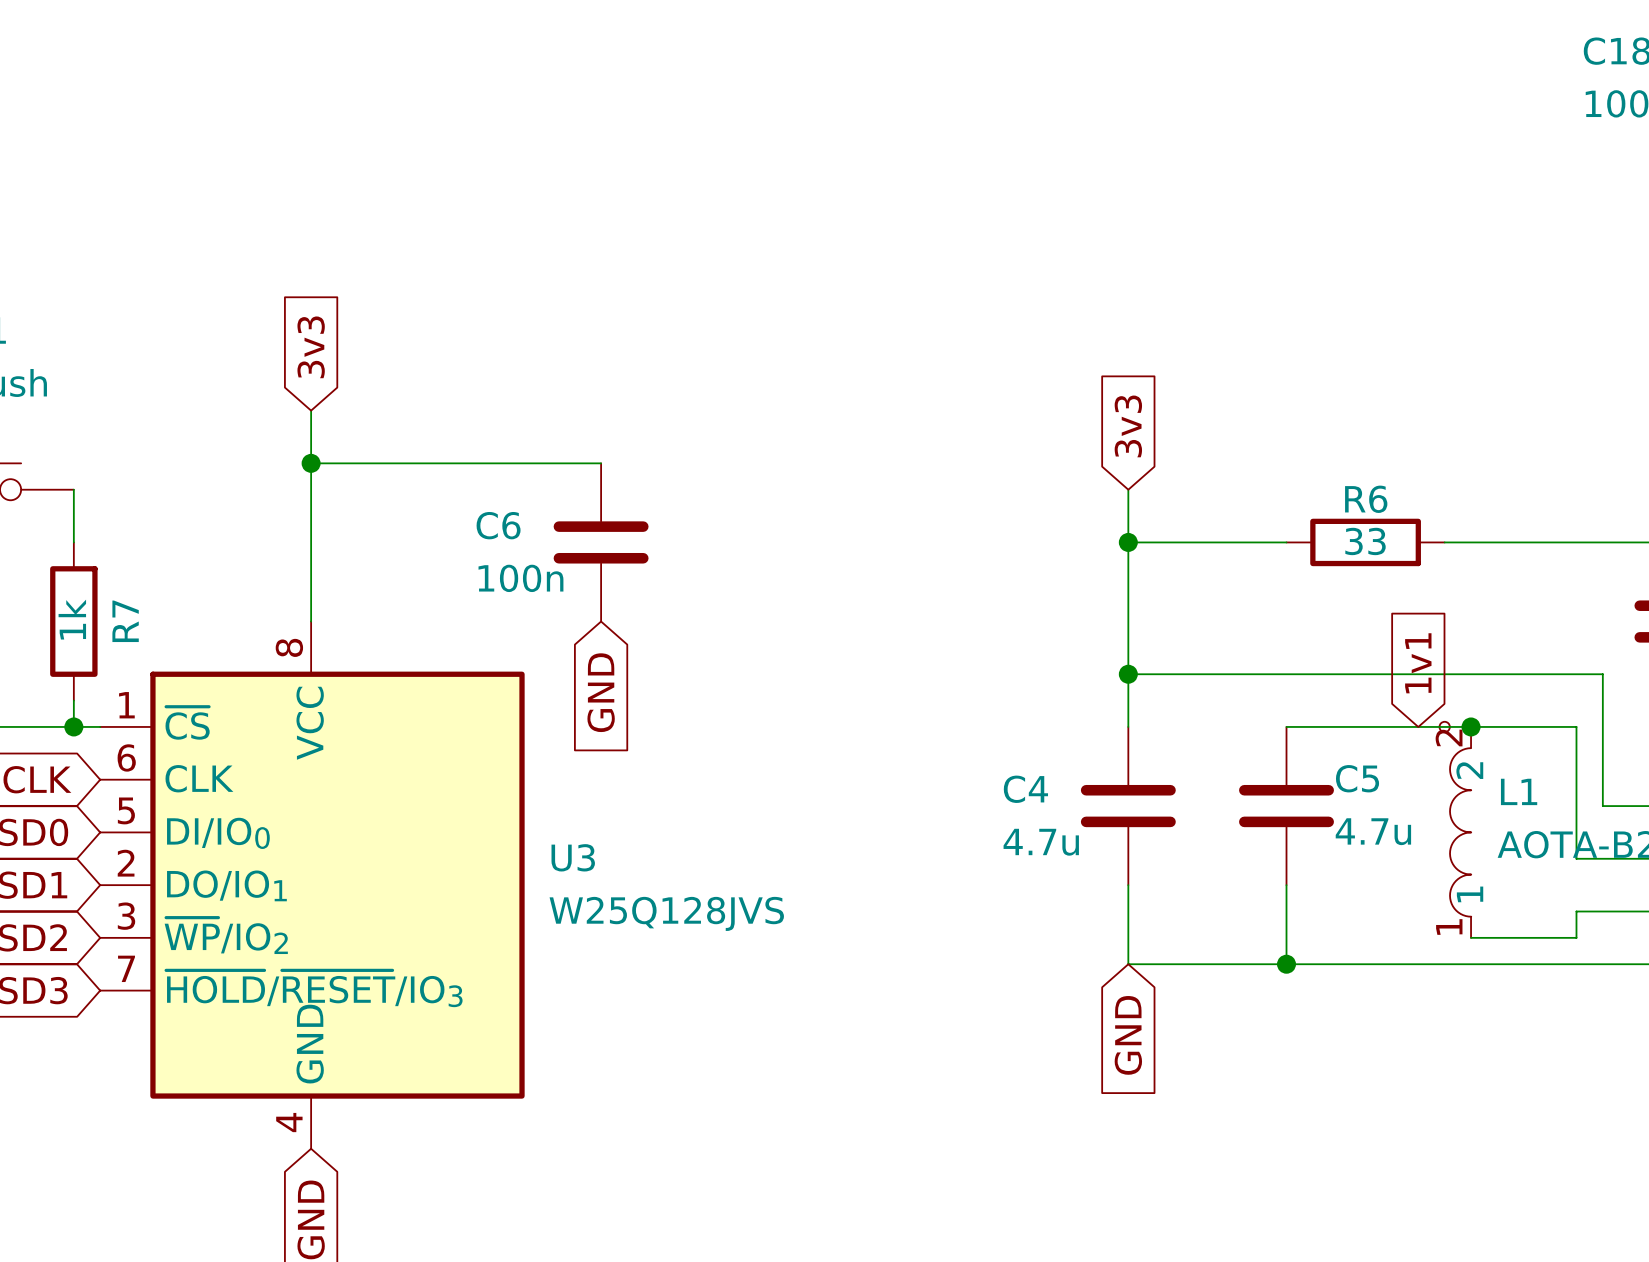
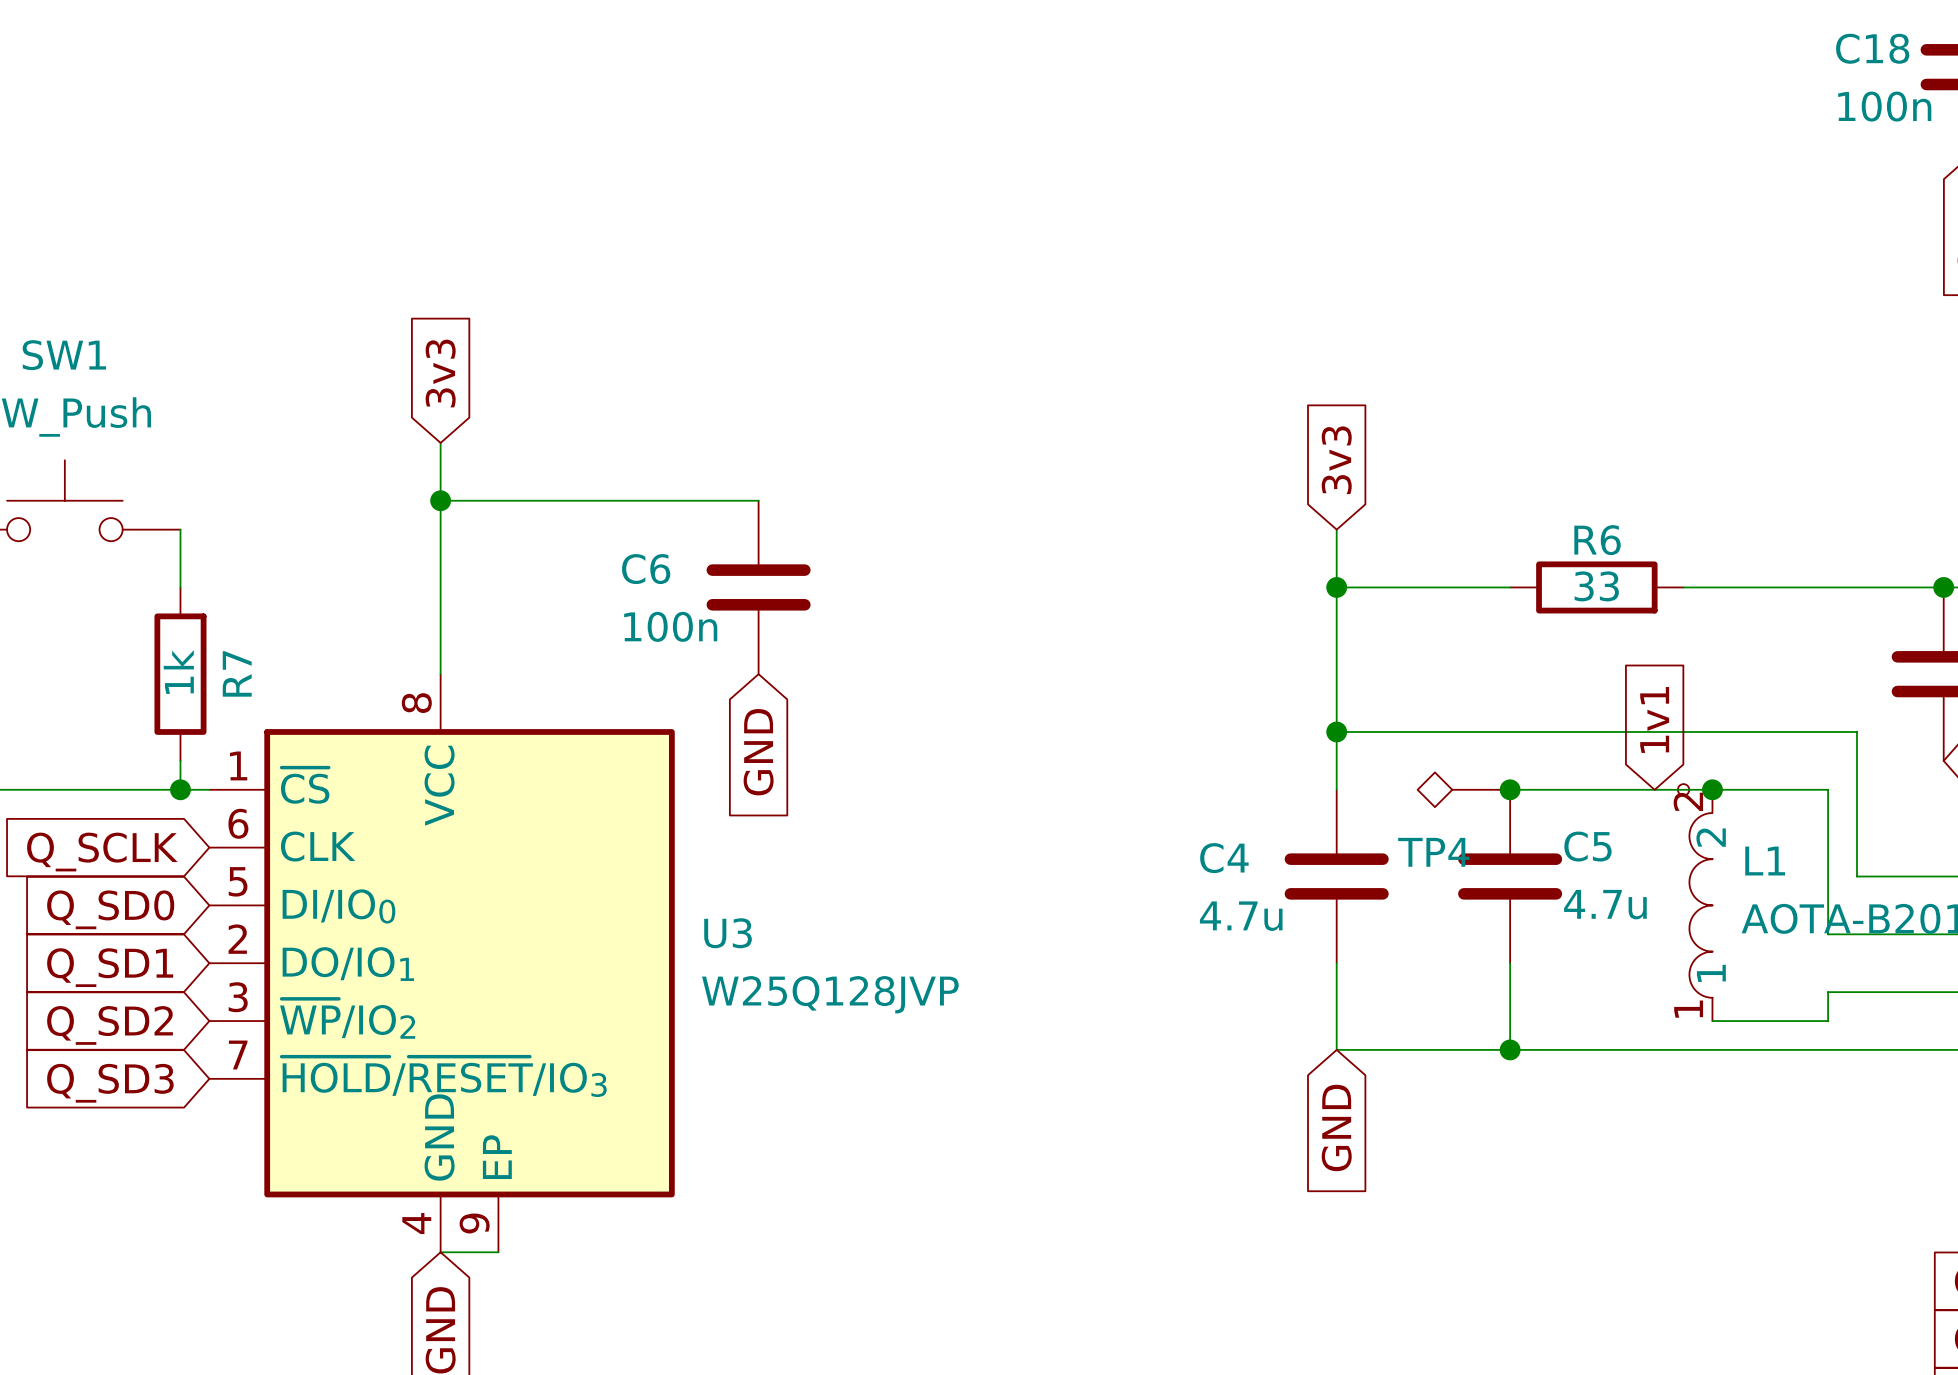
U3 symbol: [100, 621, 525, 1149] -> [209, 674, 675, 1253]
TP4: none -> (1463, 789)
junction: none -> (1510, 789)
U3 value: W25Q128JVS (666, 913) -> W25Q128JVP (830, 994)
wire: none -> (440, 1252) (498, 1252)

